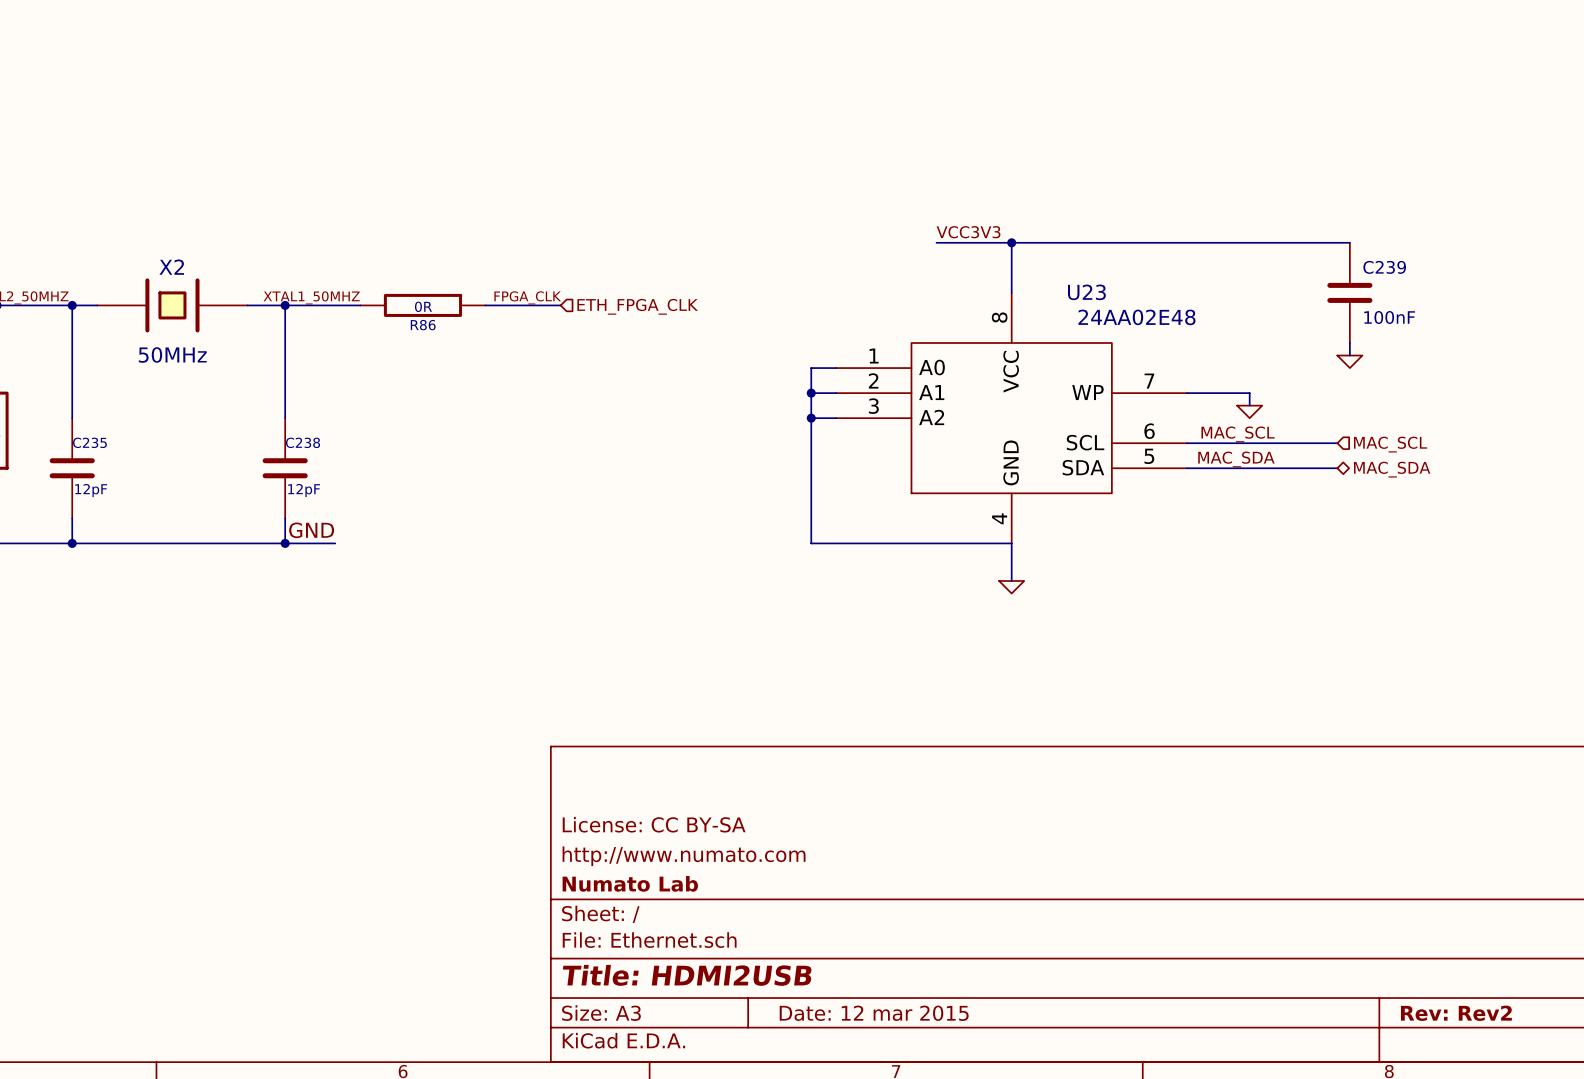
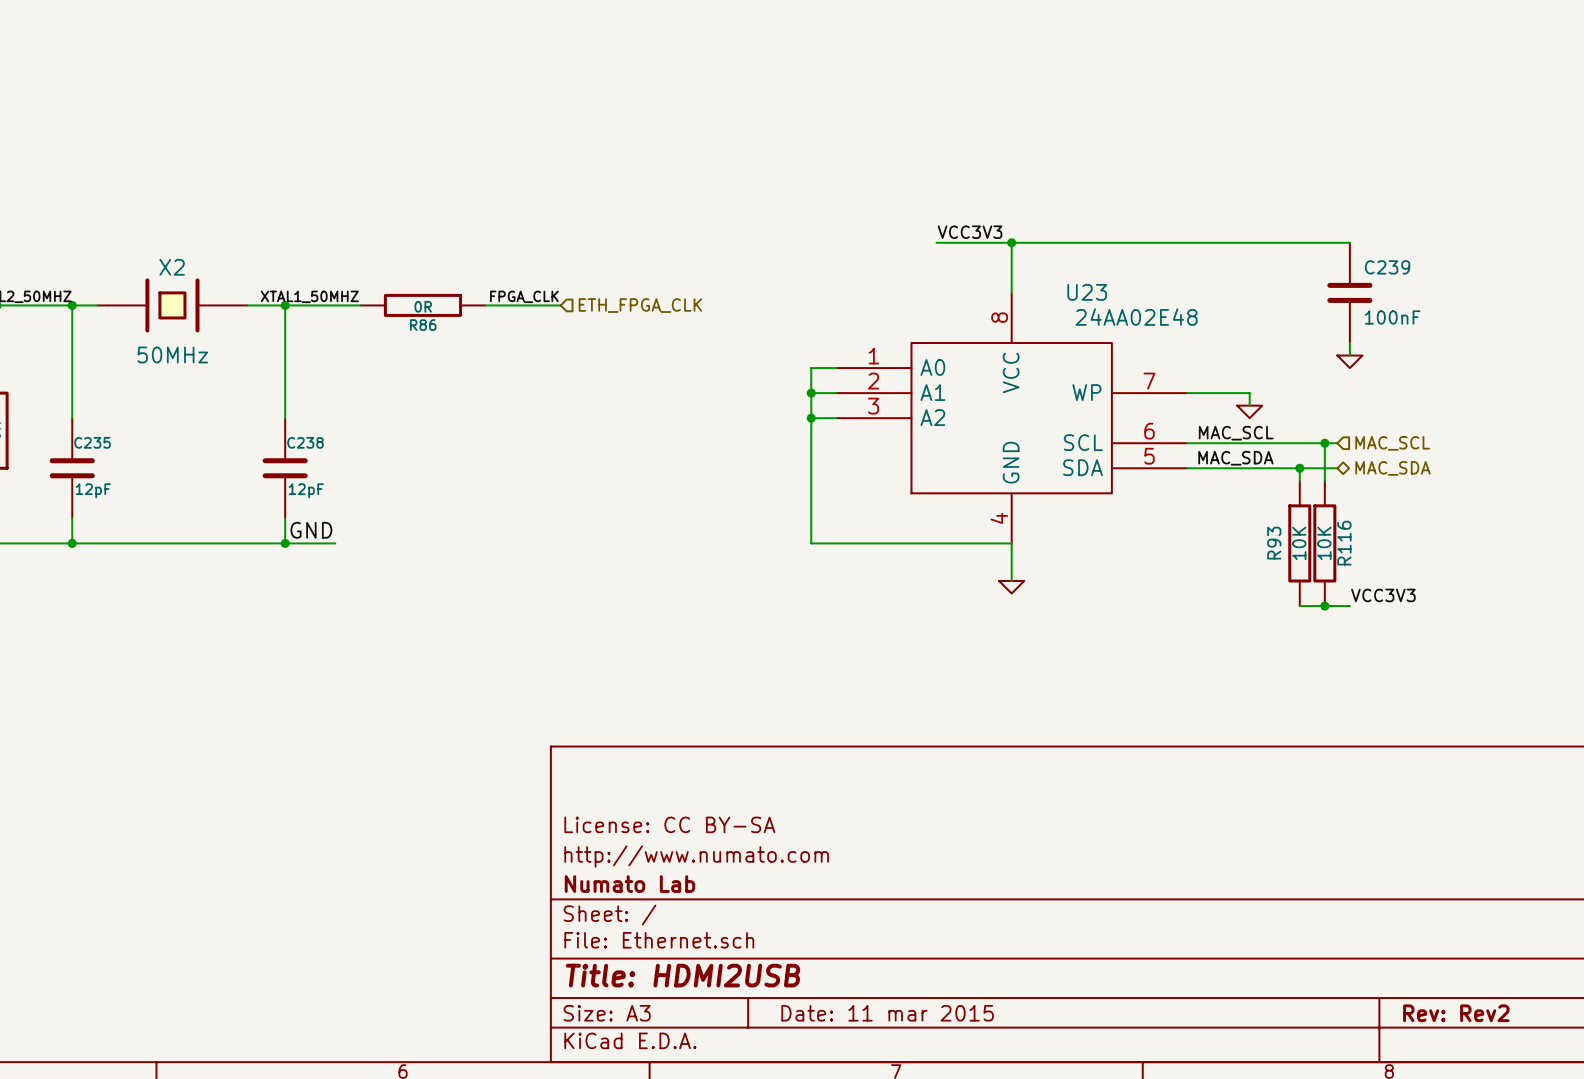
wire: none -> (1324, 443) (1324, 480)
junction: none -> (1324, 443)
wire: none -> (1299, 468) (1299, 480)
junction: none -> (1299, 468)
R93: none -> 10K (1299, 543)
R116: none -> 10K (1324, 543)
label: none -> VCC3V3 (1383, 595)
wire: none -> (1299, 606) (1349, 606)
junction: none -> (1324, 606)
title block: Date: 12 mar 2015 (874, 1013) -> Date: 11 mar 2015 (887, 1013)

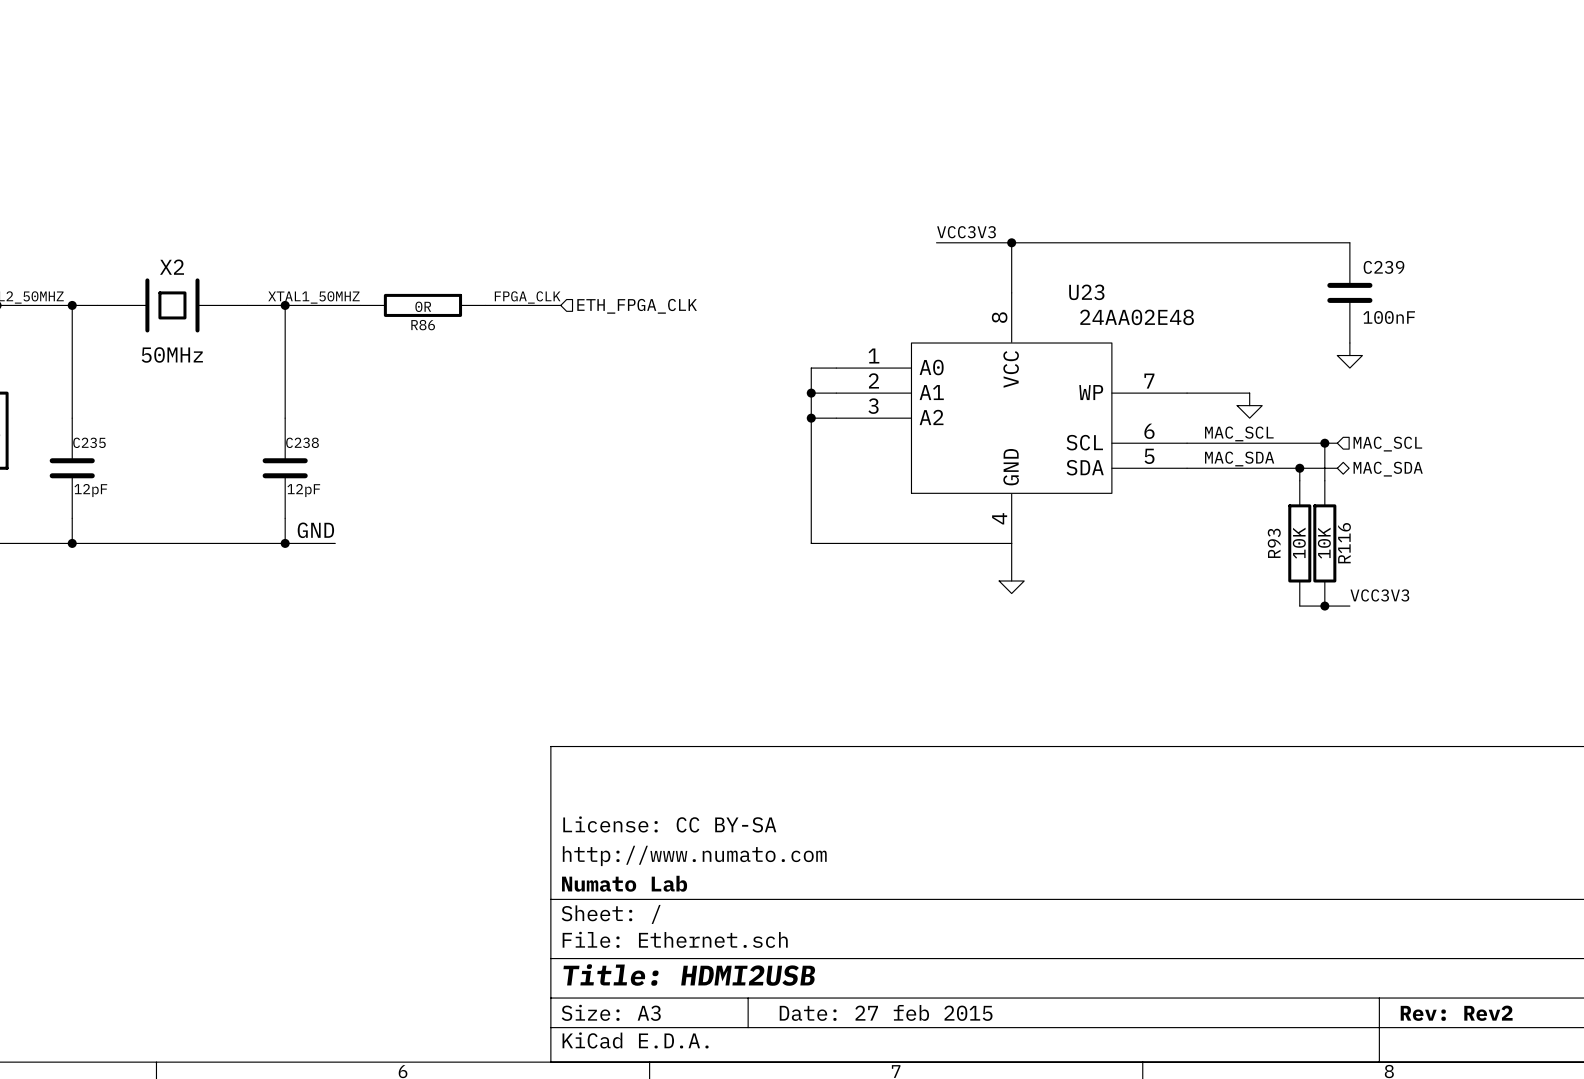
title block: Date: 11 mar 2015 (887, 1013) -> Date: 27 feb 2015 (886, 1012)

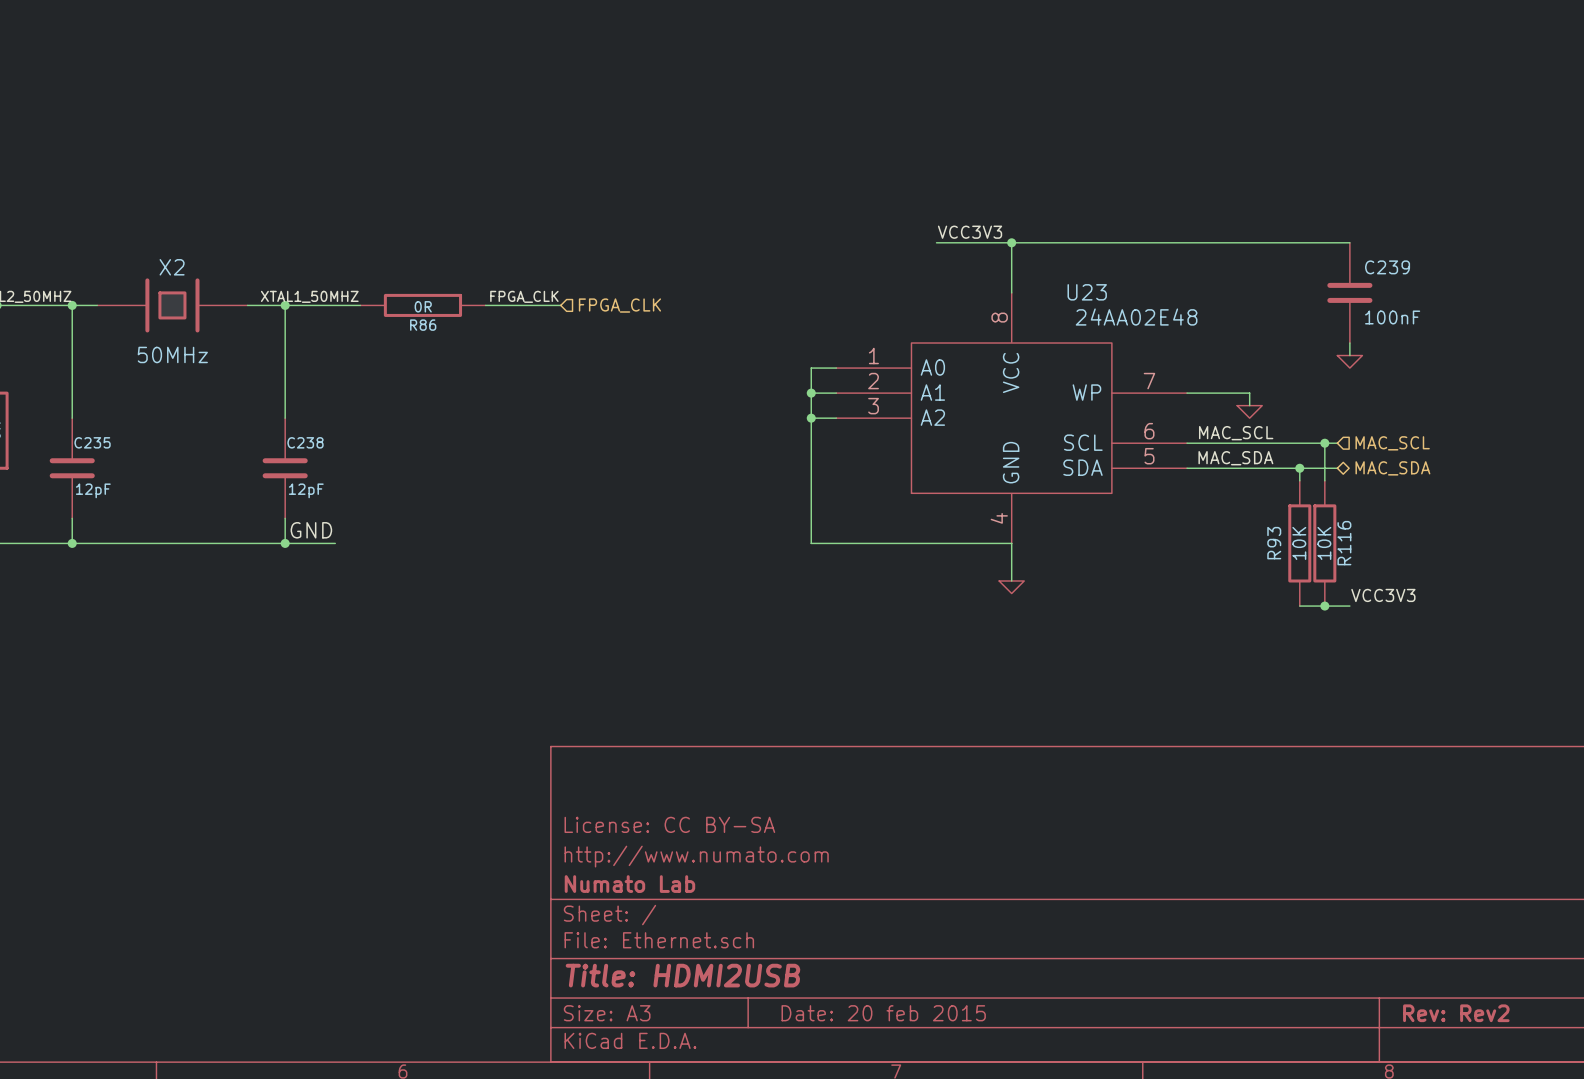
hierarchical label: ETH_FPGA_CLK (637, 306) -> FPGA_CLK (619, 305)
title block: Date: 27 feb 2015 (886, 1012) -> Date: 20 feb 2015 (883, 1013)

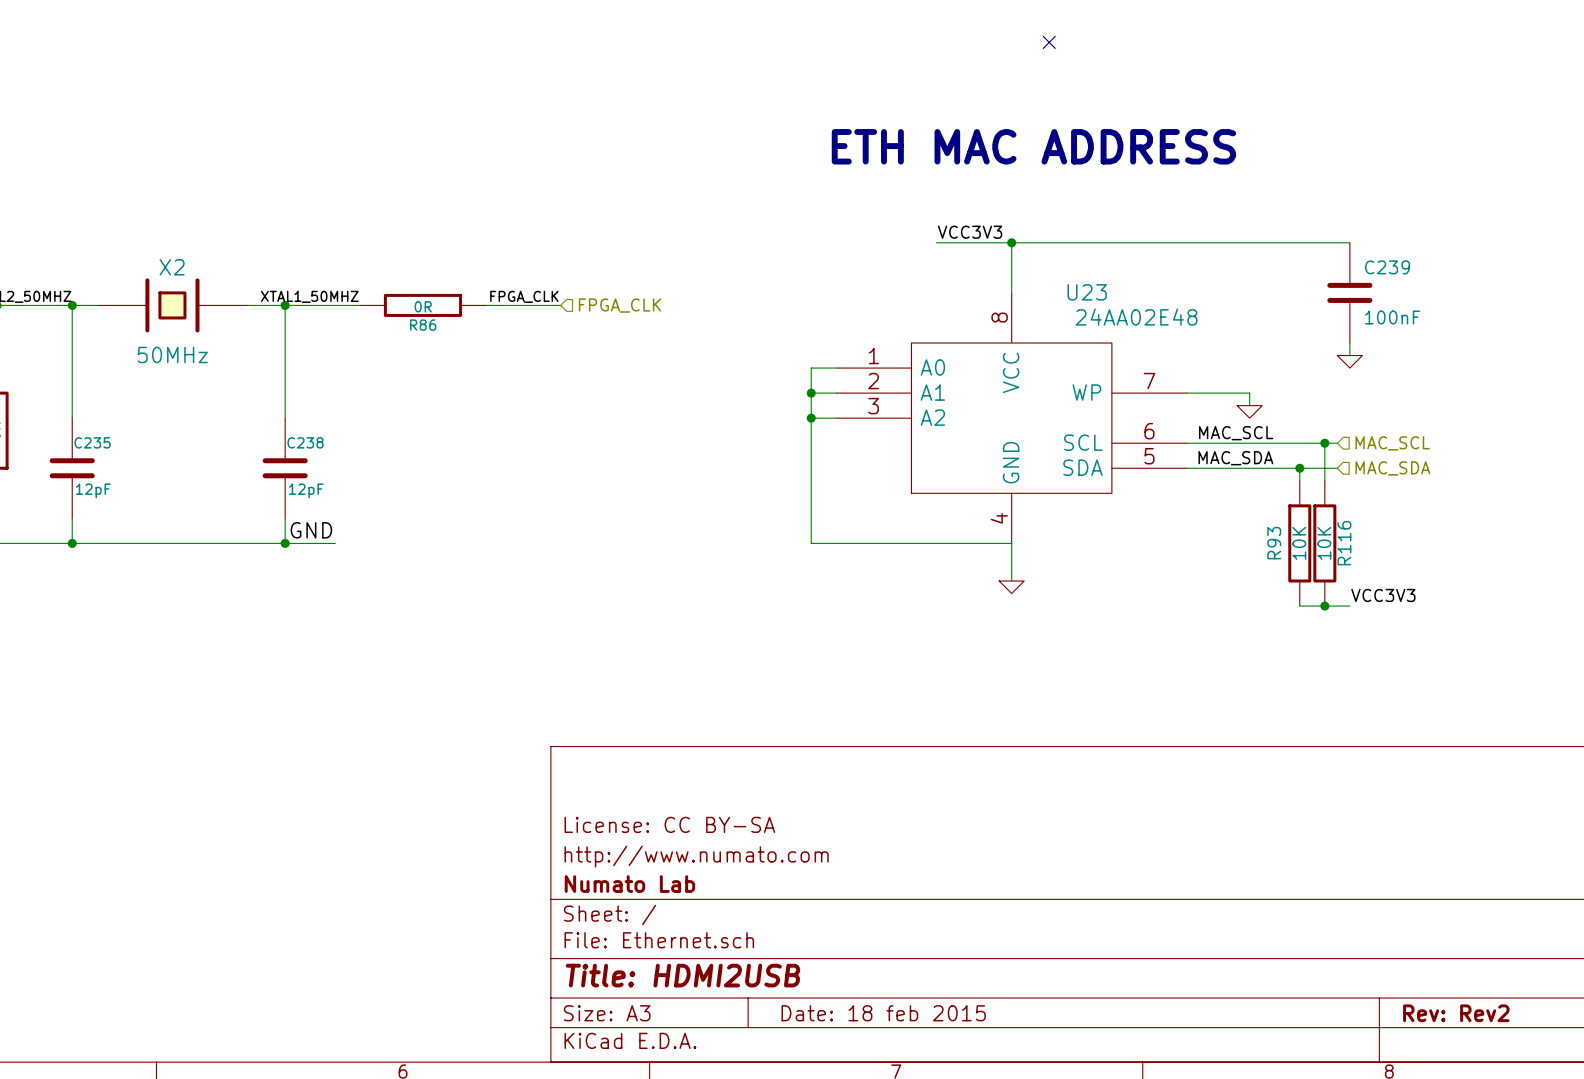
no-connect mark: none -> (1049, 42)
text: none -> ETH MAC ADDRESS (1033, 146)
hierarchical label shape: bidirectional (1392, 468) -> input (1392, 468)
title block: Date: 20 feb 2015 (883, 1013) -> Date: 18 feb 2015 (883, 1013)

